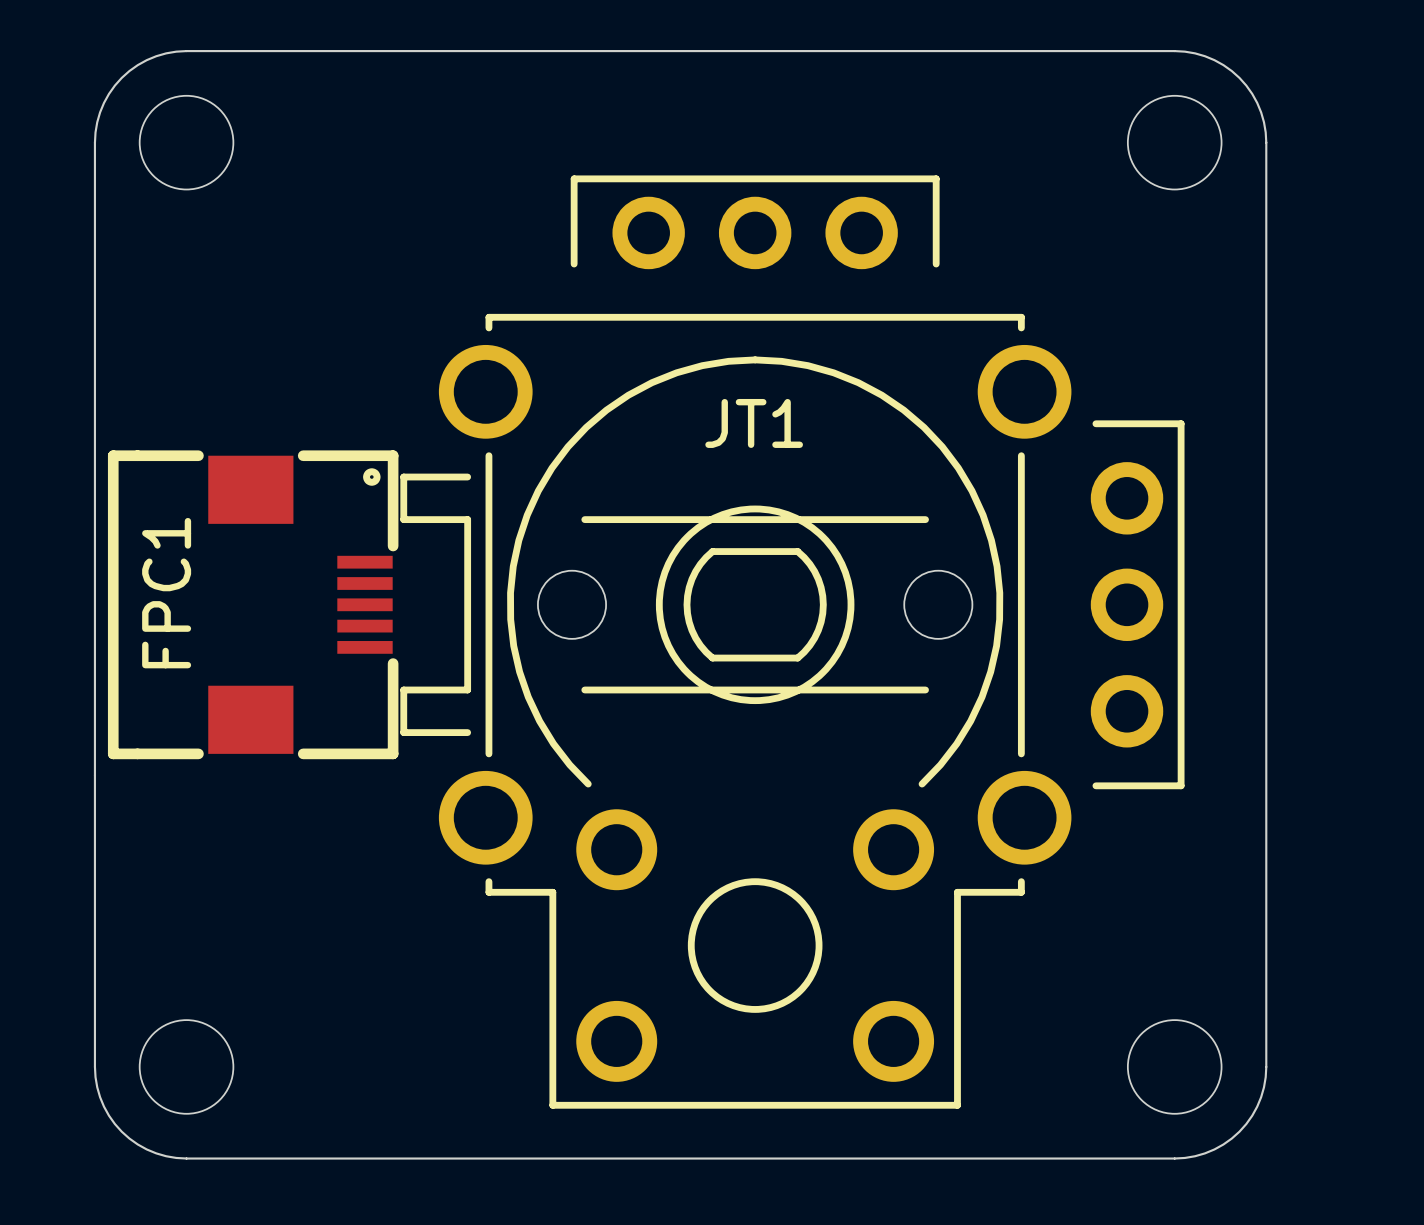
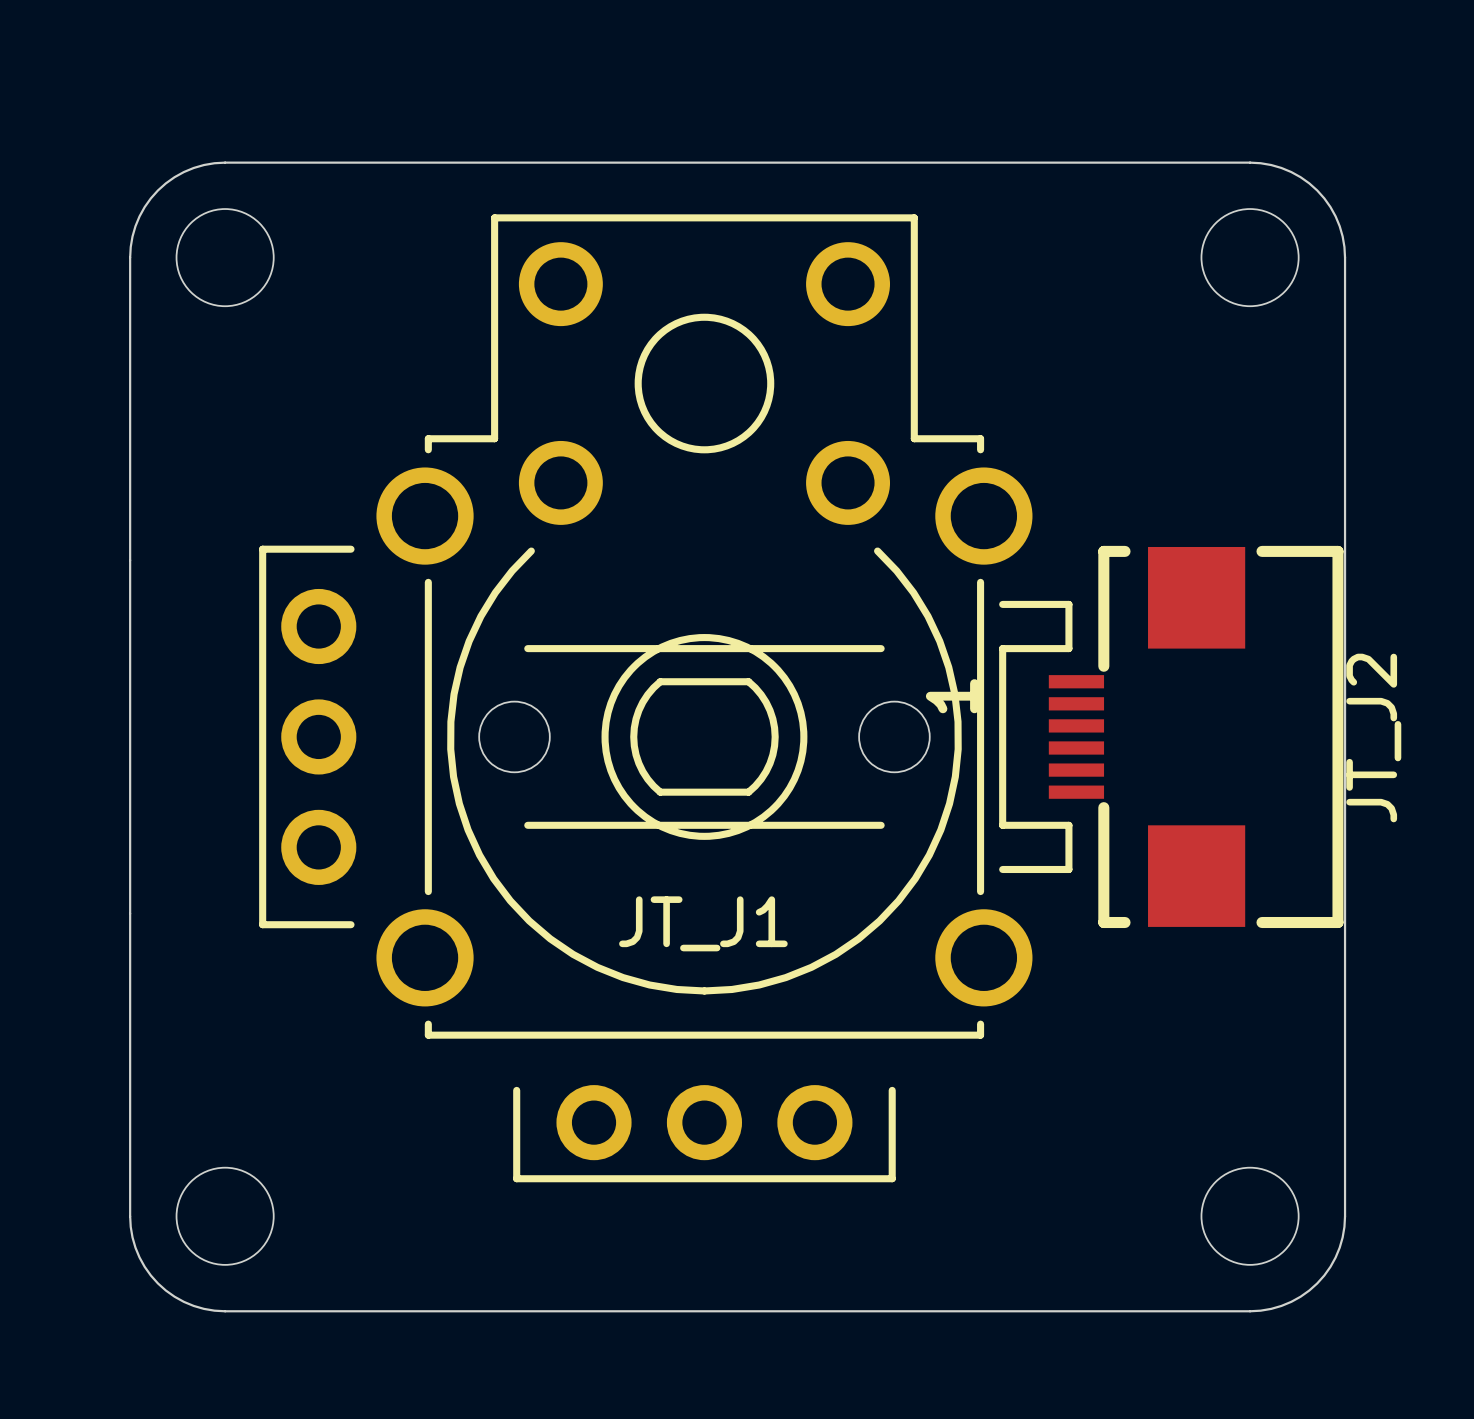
JT_J1: none -> (665, 698)
FPC1: (253, 604) -> none
JT_J2: none -> (1196, 736)
JT1: (792, 642) -> none

